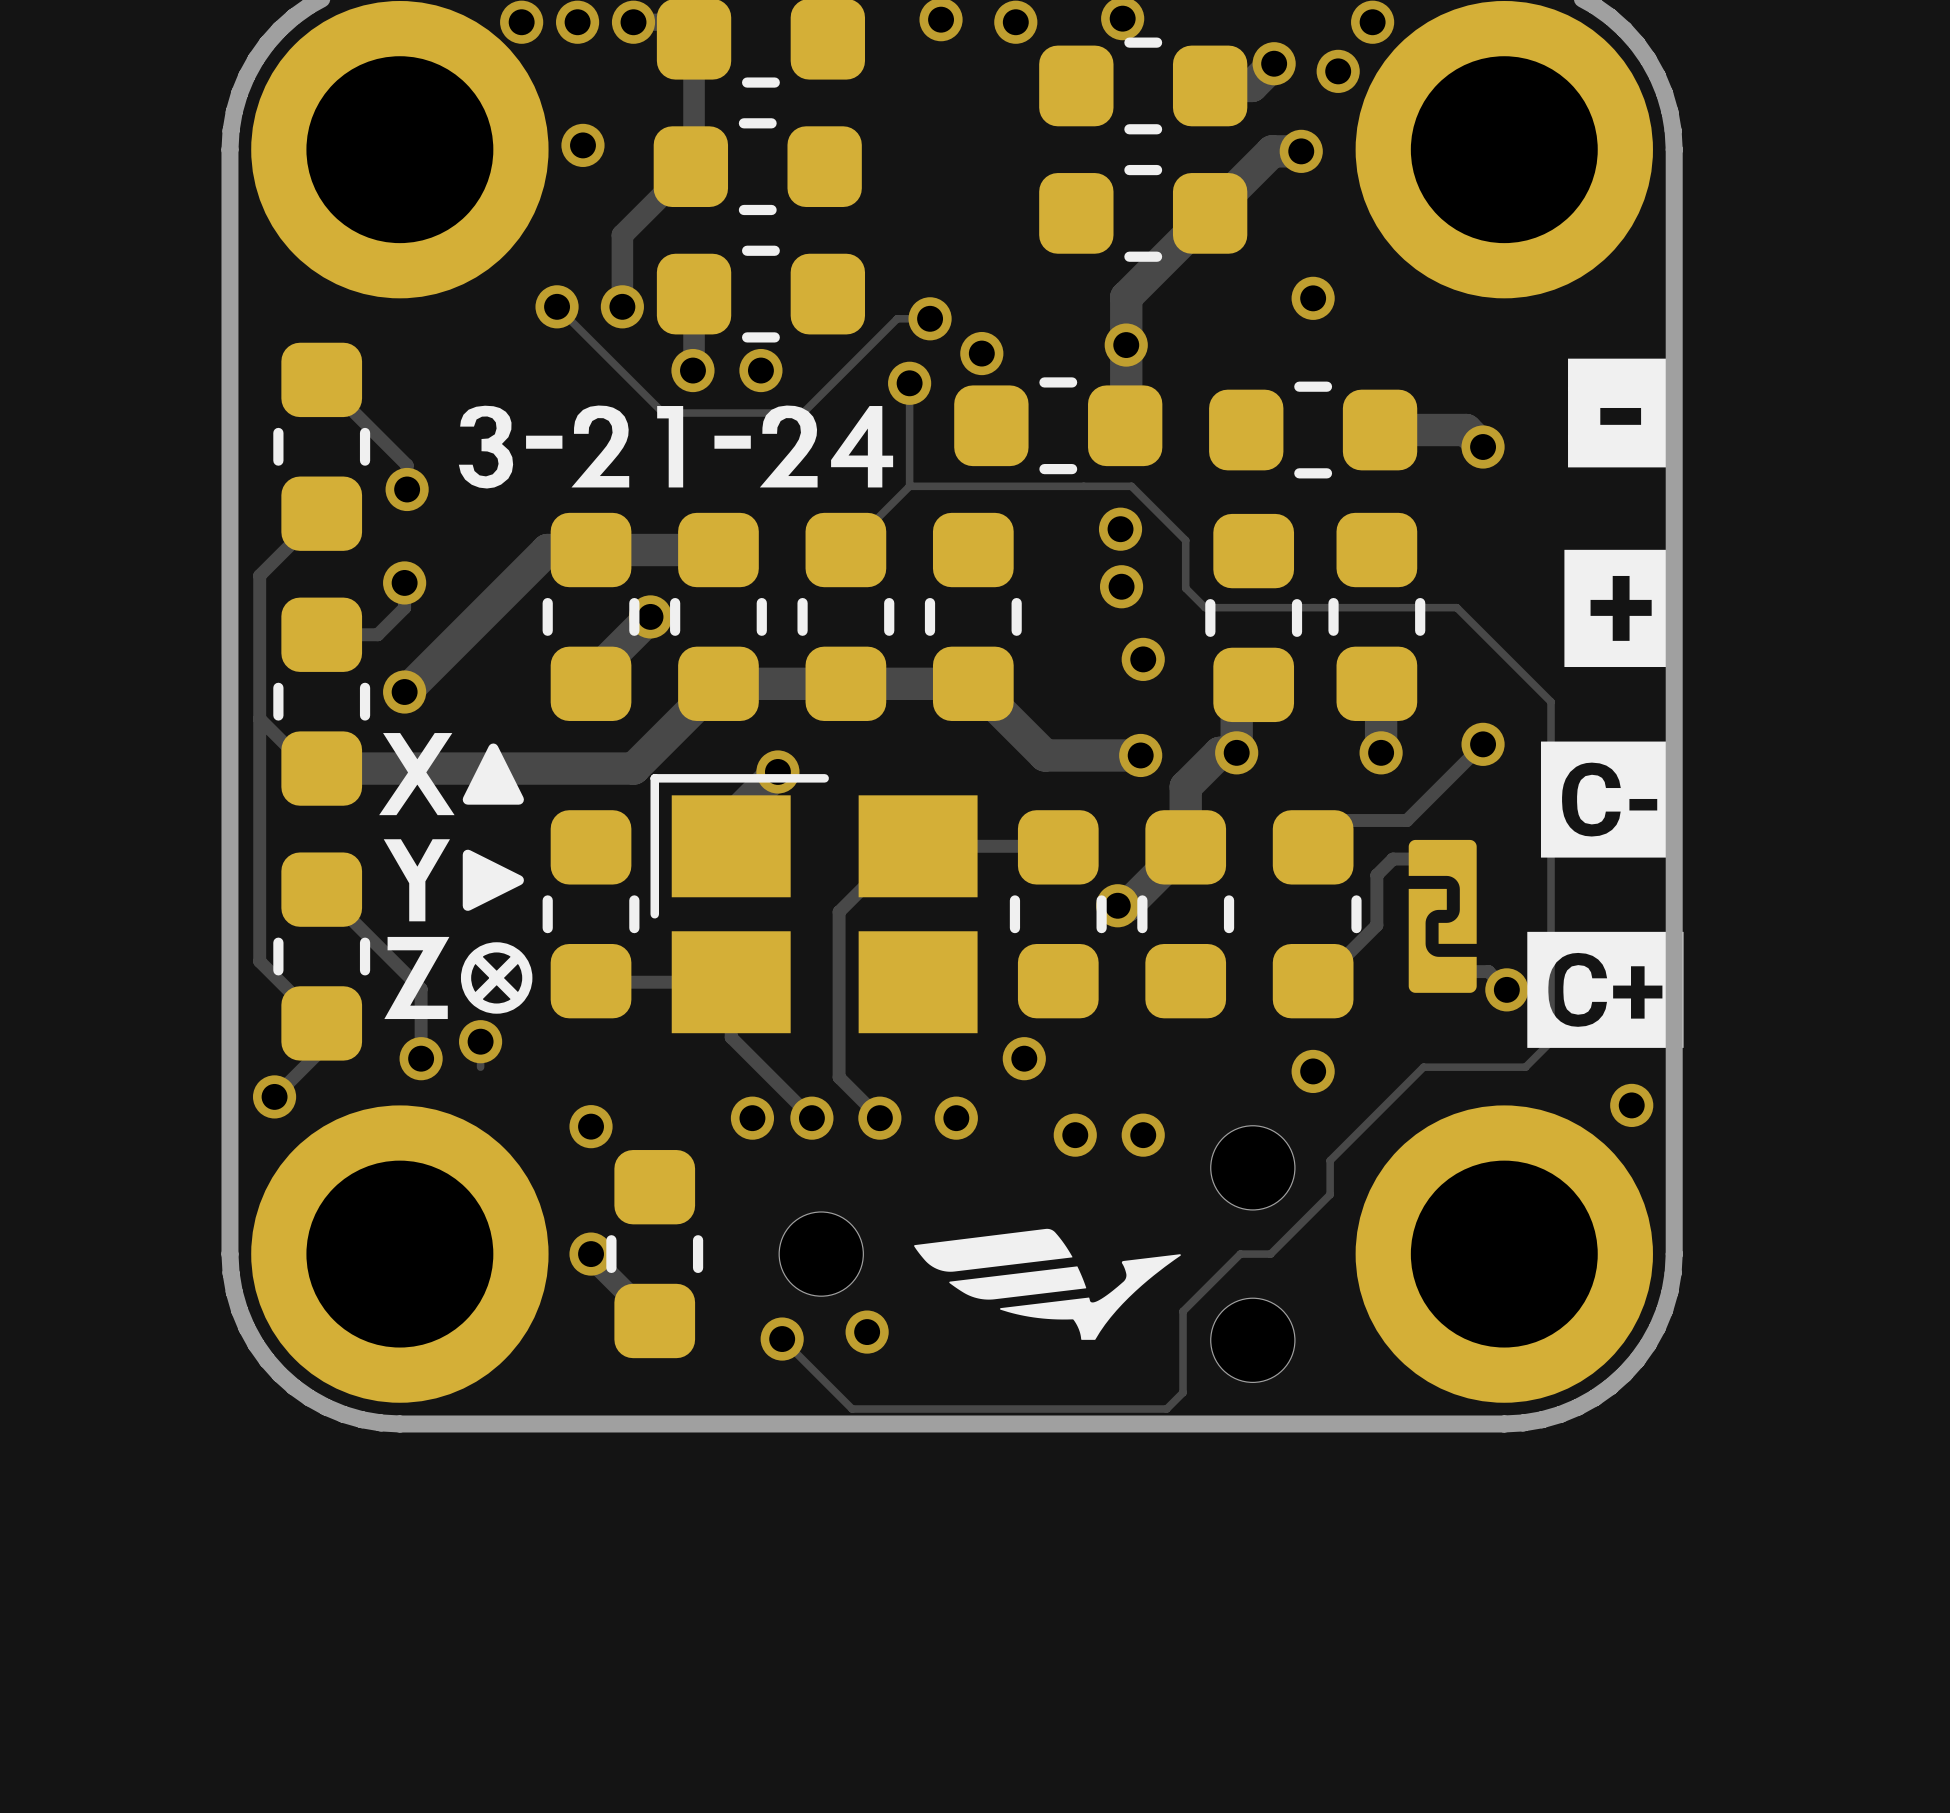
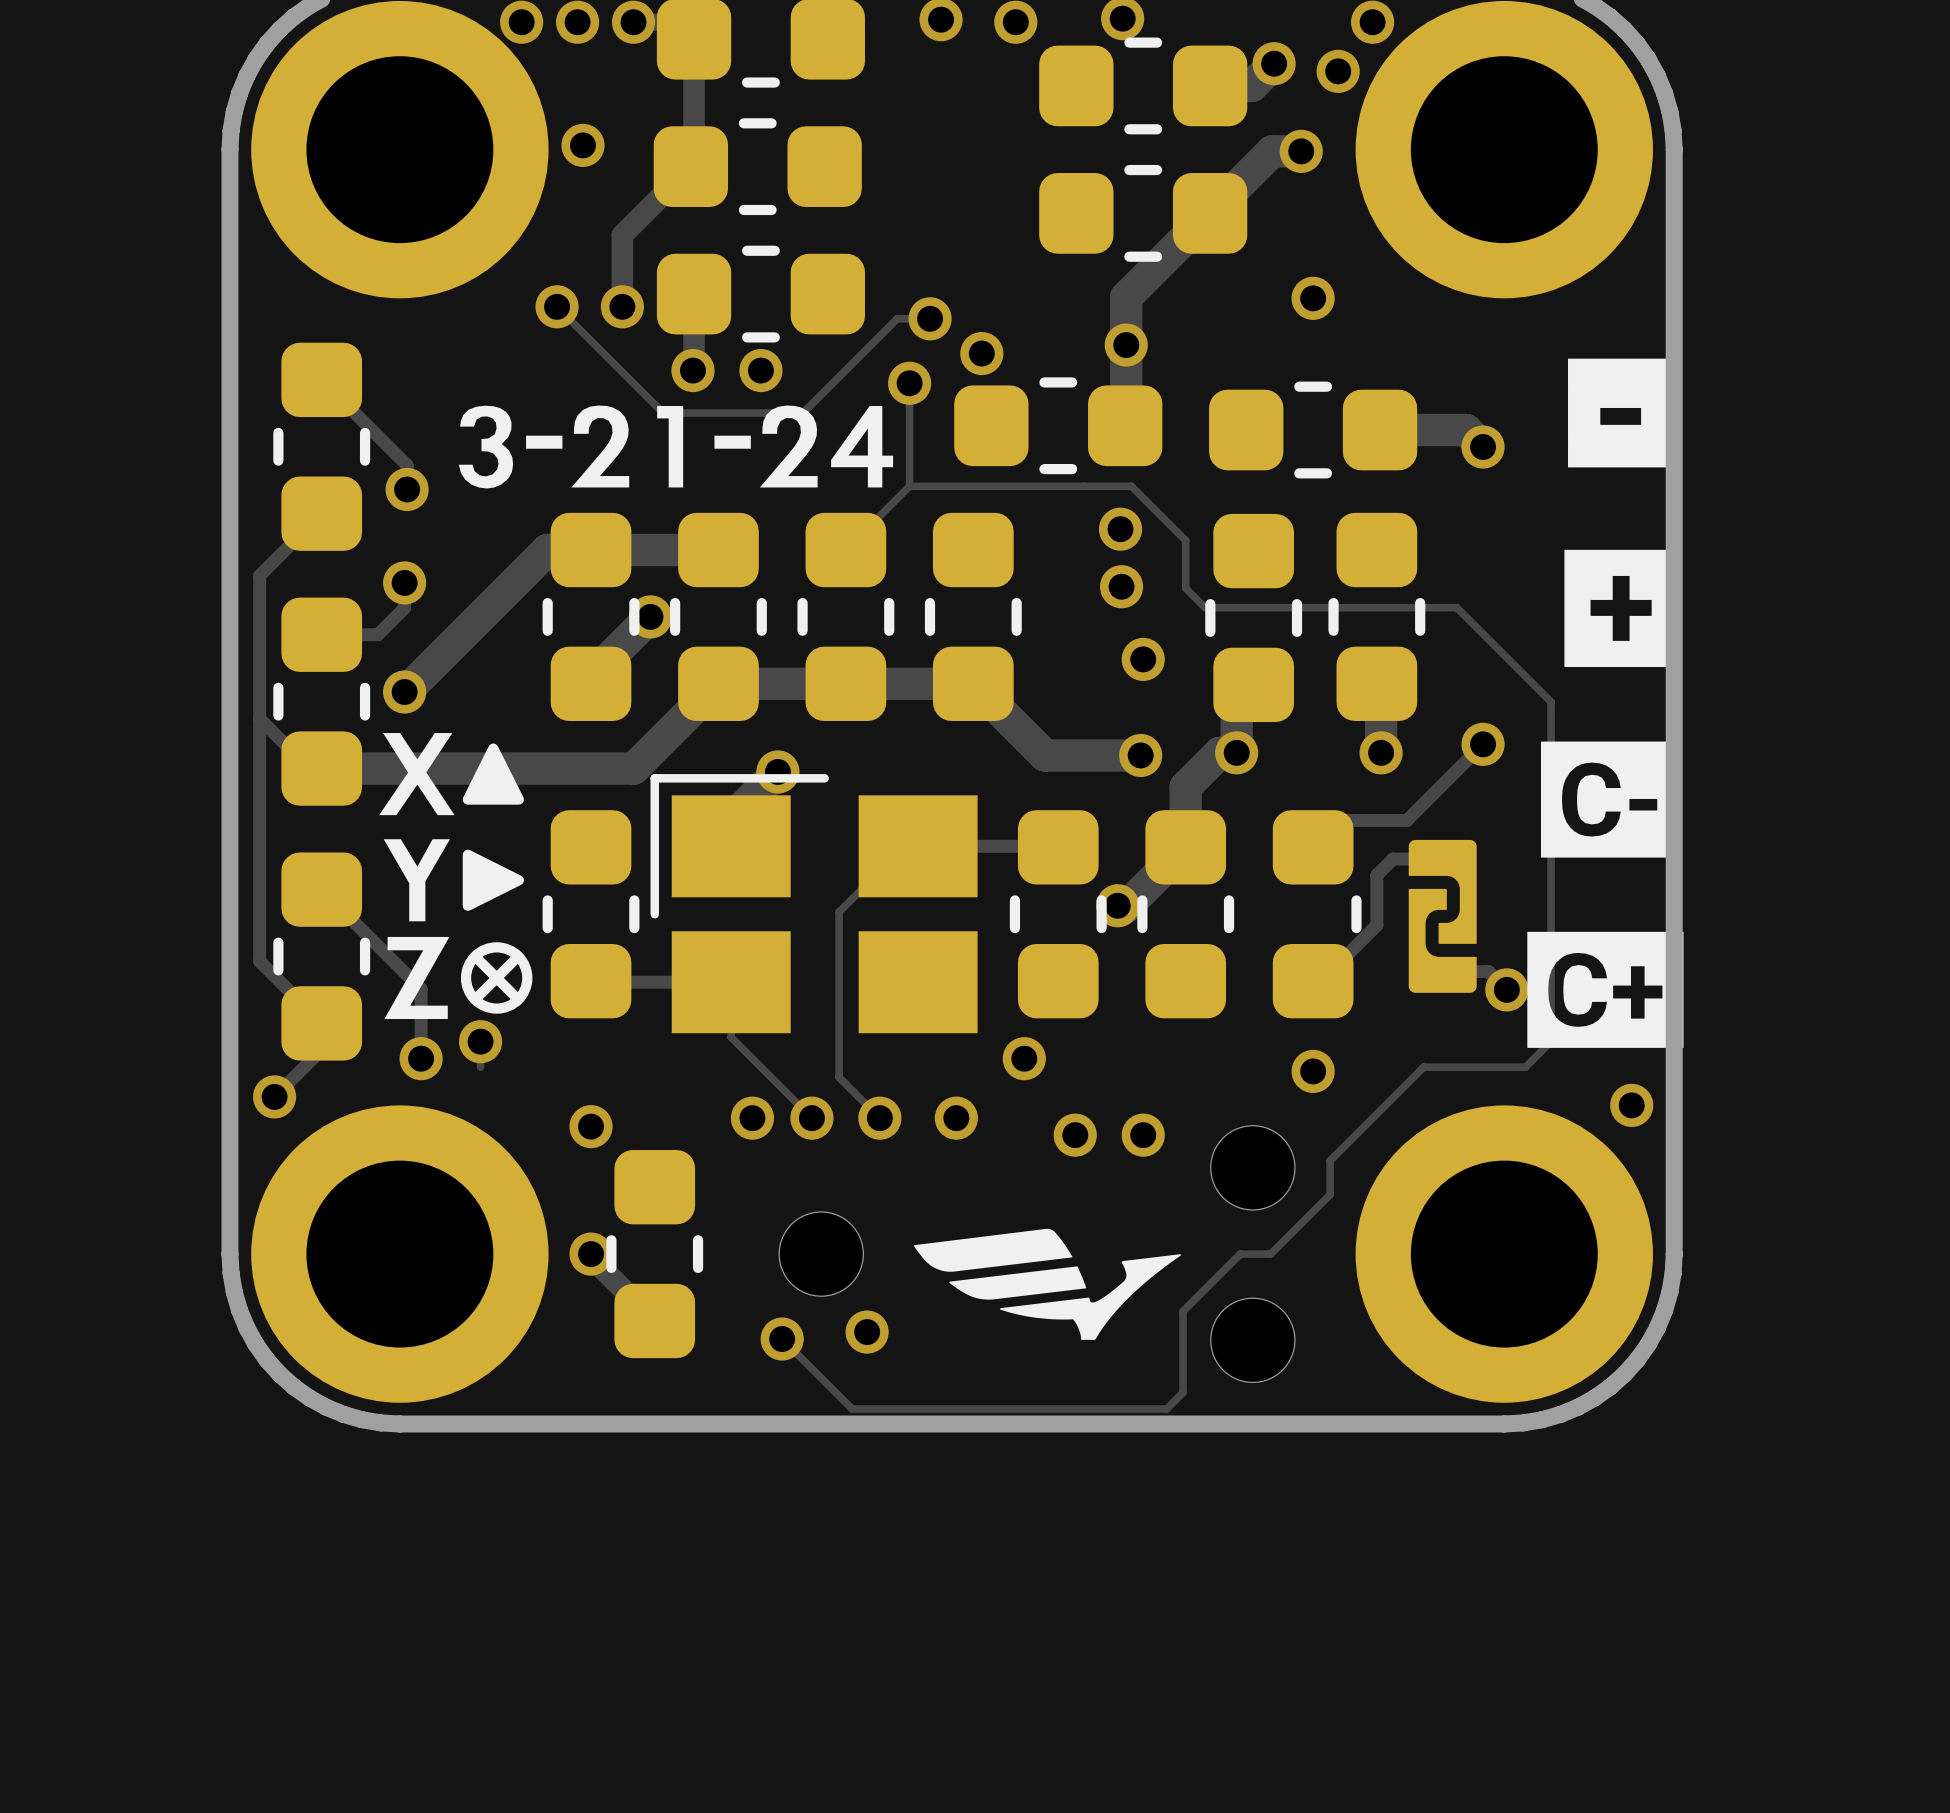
track width: thick (918, 846) (904, 846) (839, 911) (839, 1077) (879, 1118) -> thin (918, 846) (904, 846) (839, 911) (839, 1077) (879, 1118)
track width: thick (731, 982) (731, 1037) (811, 1118) -> thin (731, 982) (731, 1037) (811, 1118)

